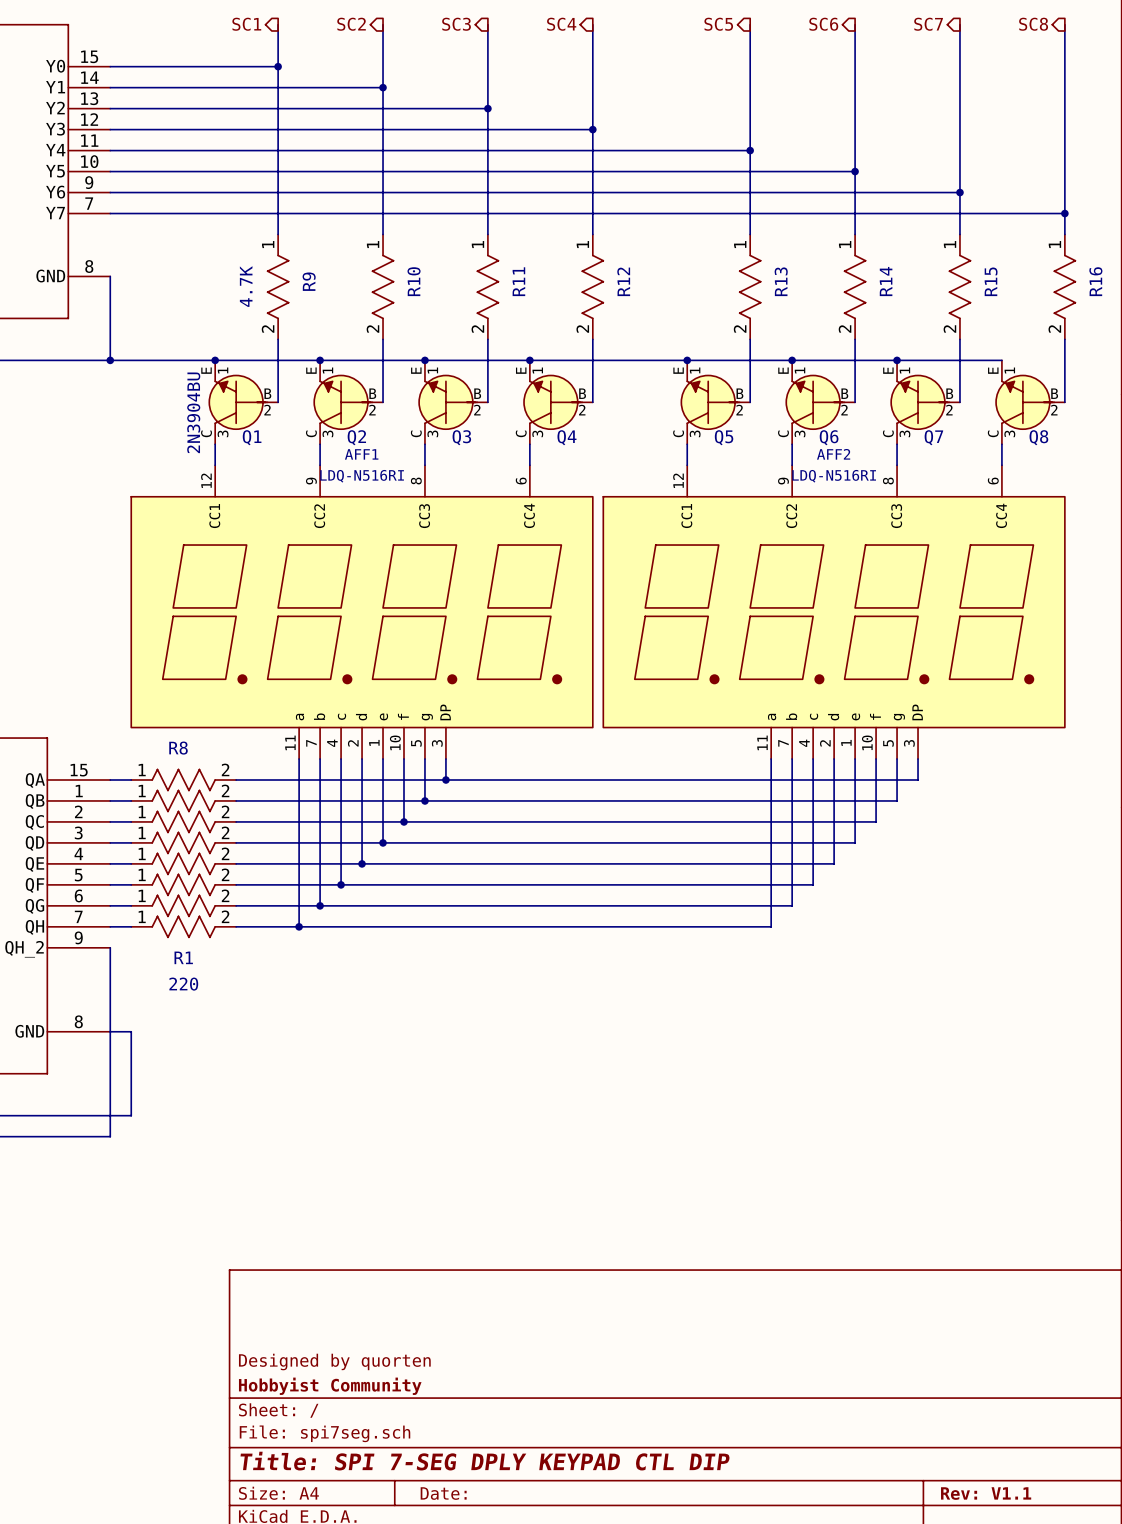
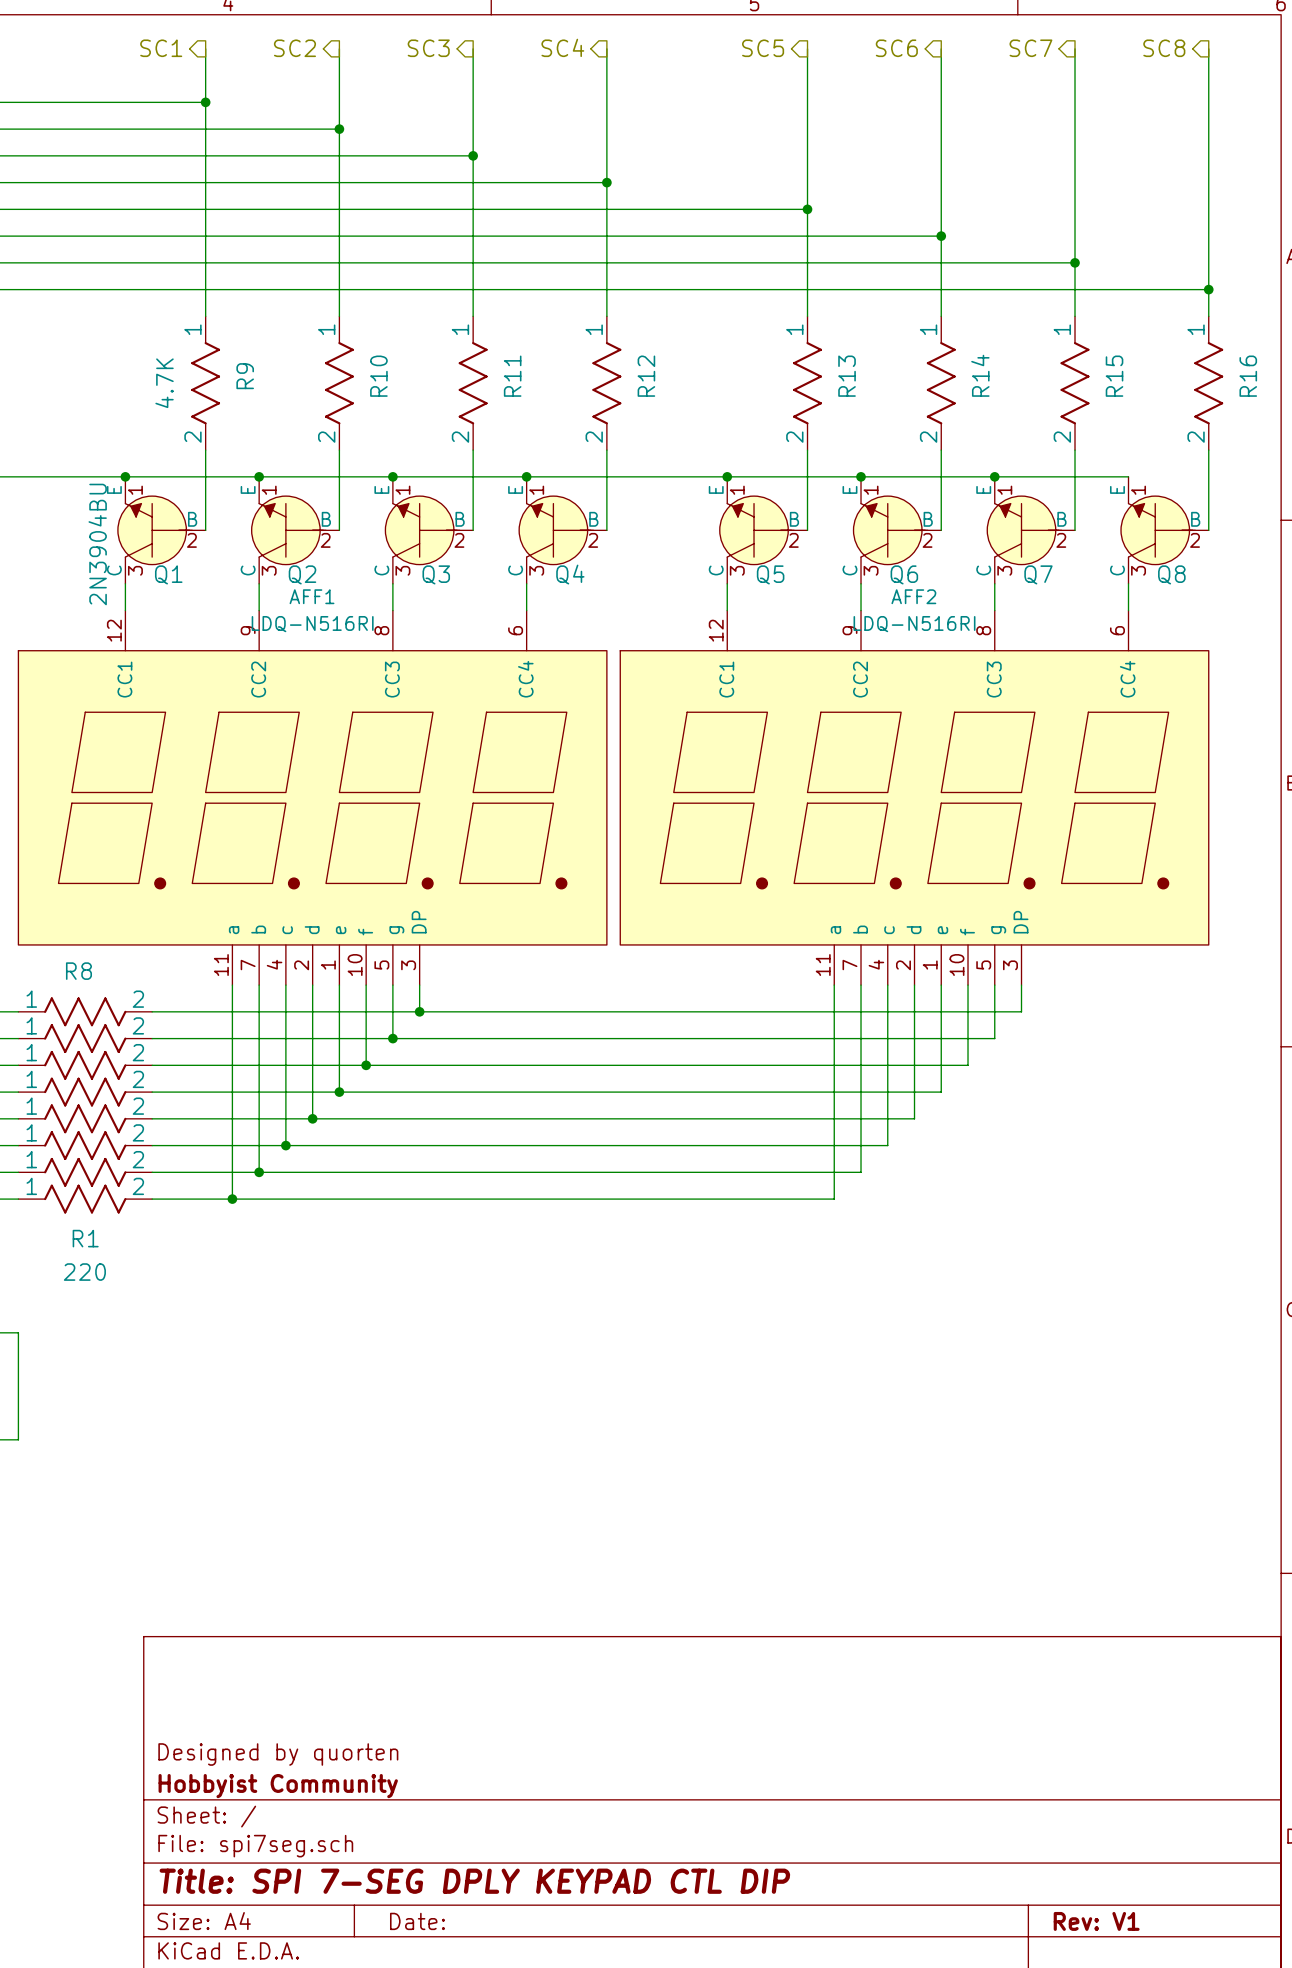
title block: Rev: V1.1 (986, 1493) -> Rev: V1 (1096, 1921)

